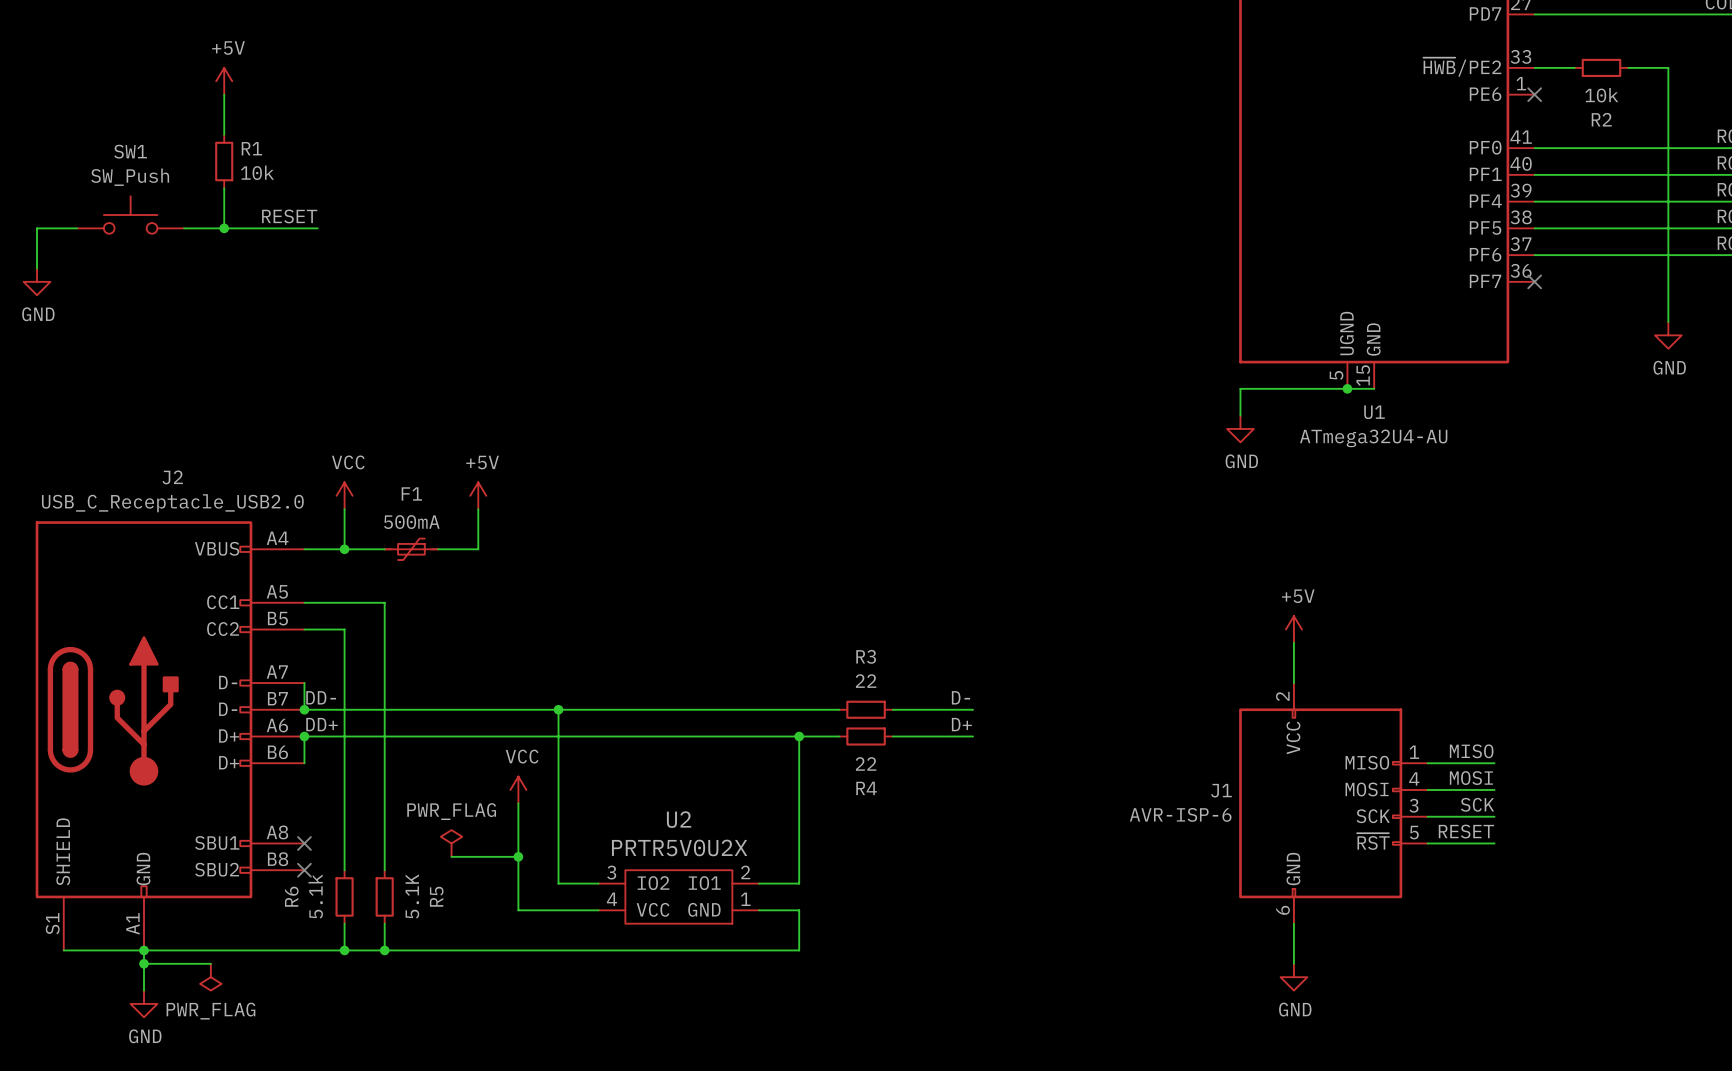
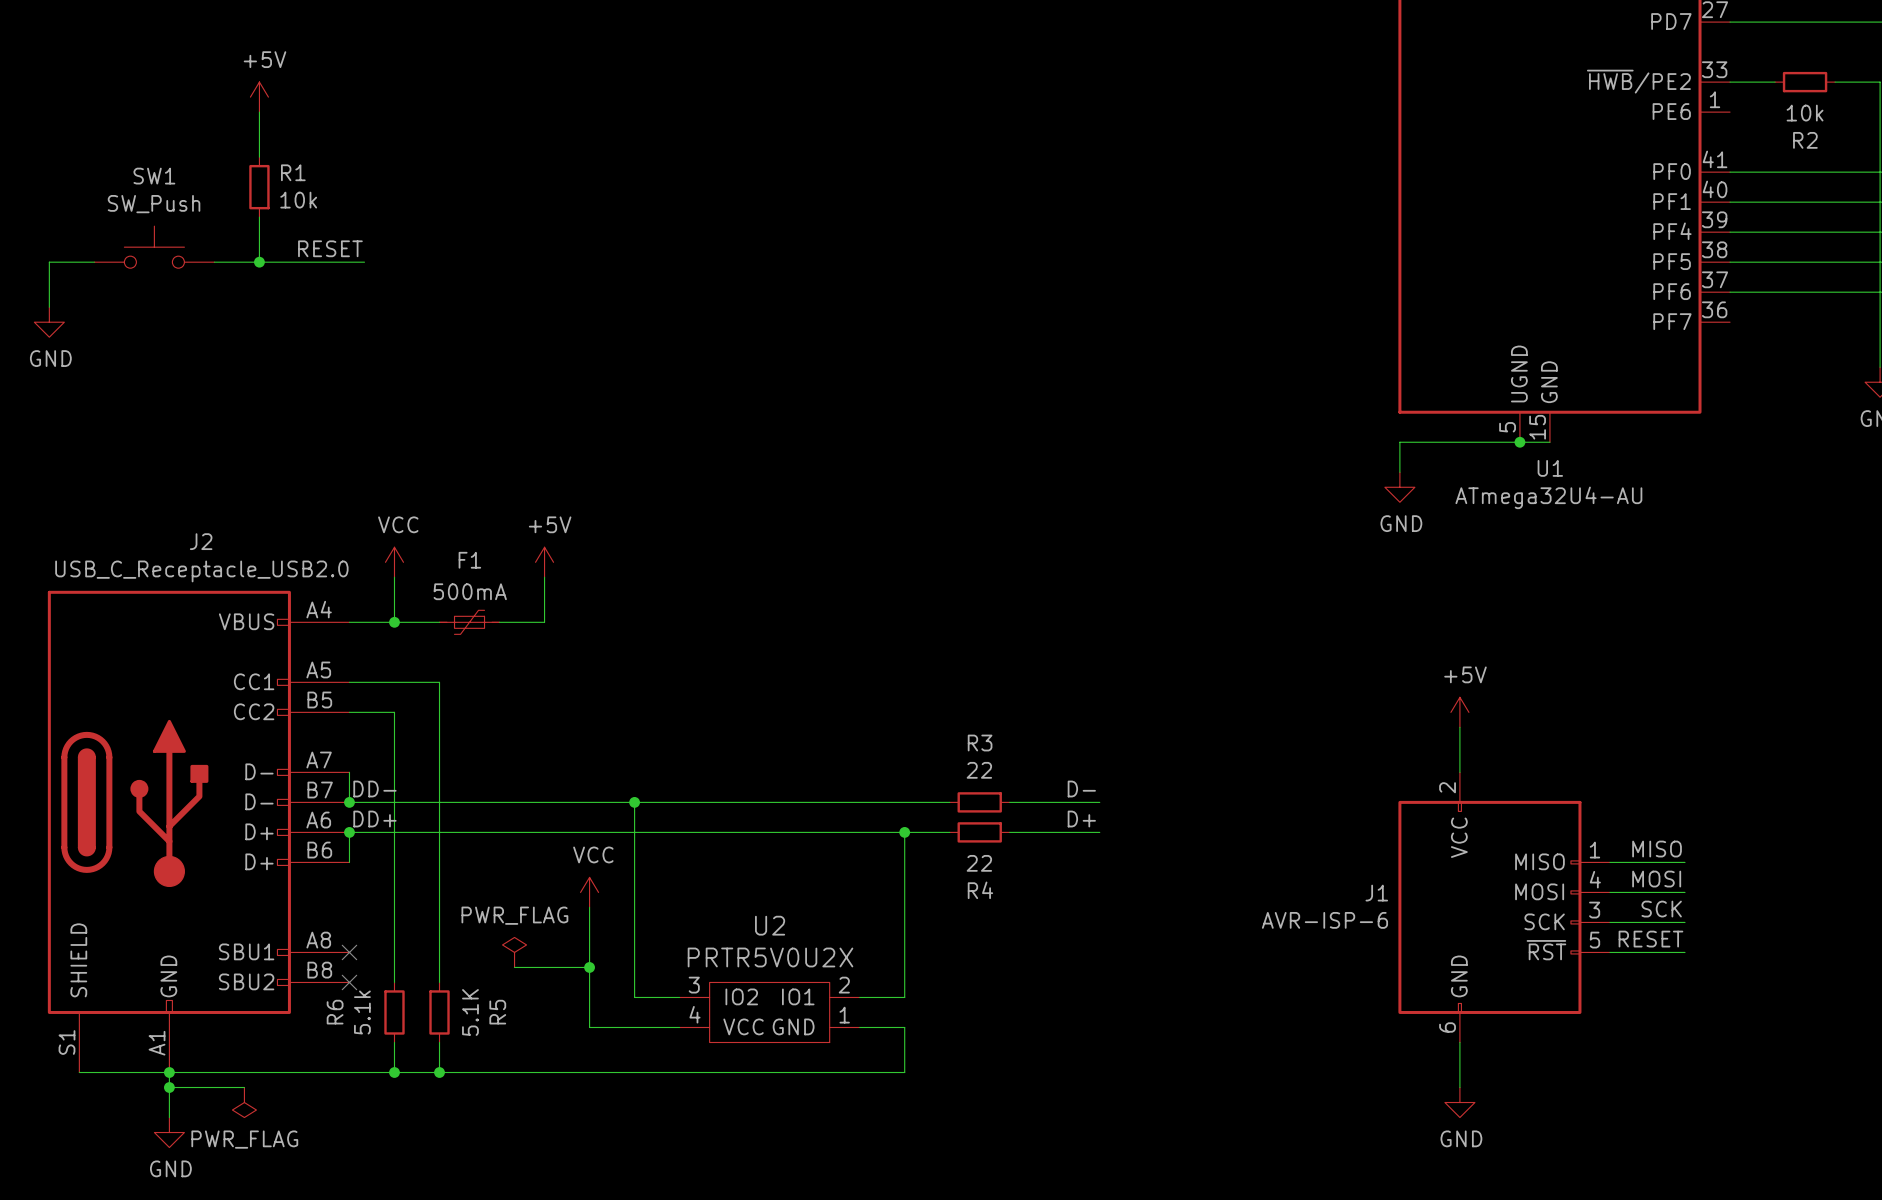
no-connect mark: (1534, 94) -> none
no-connect mark: (1534, 281) -> none

